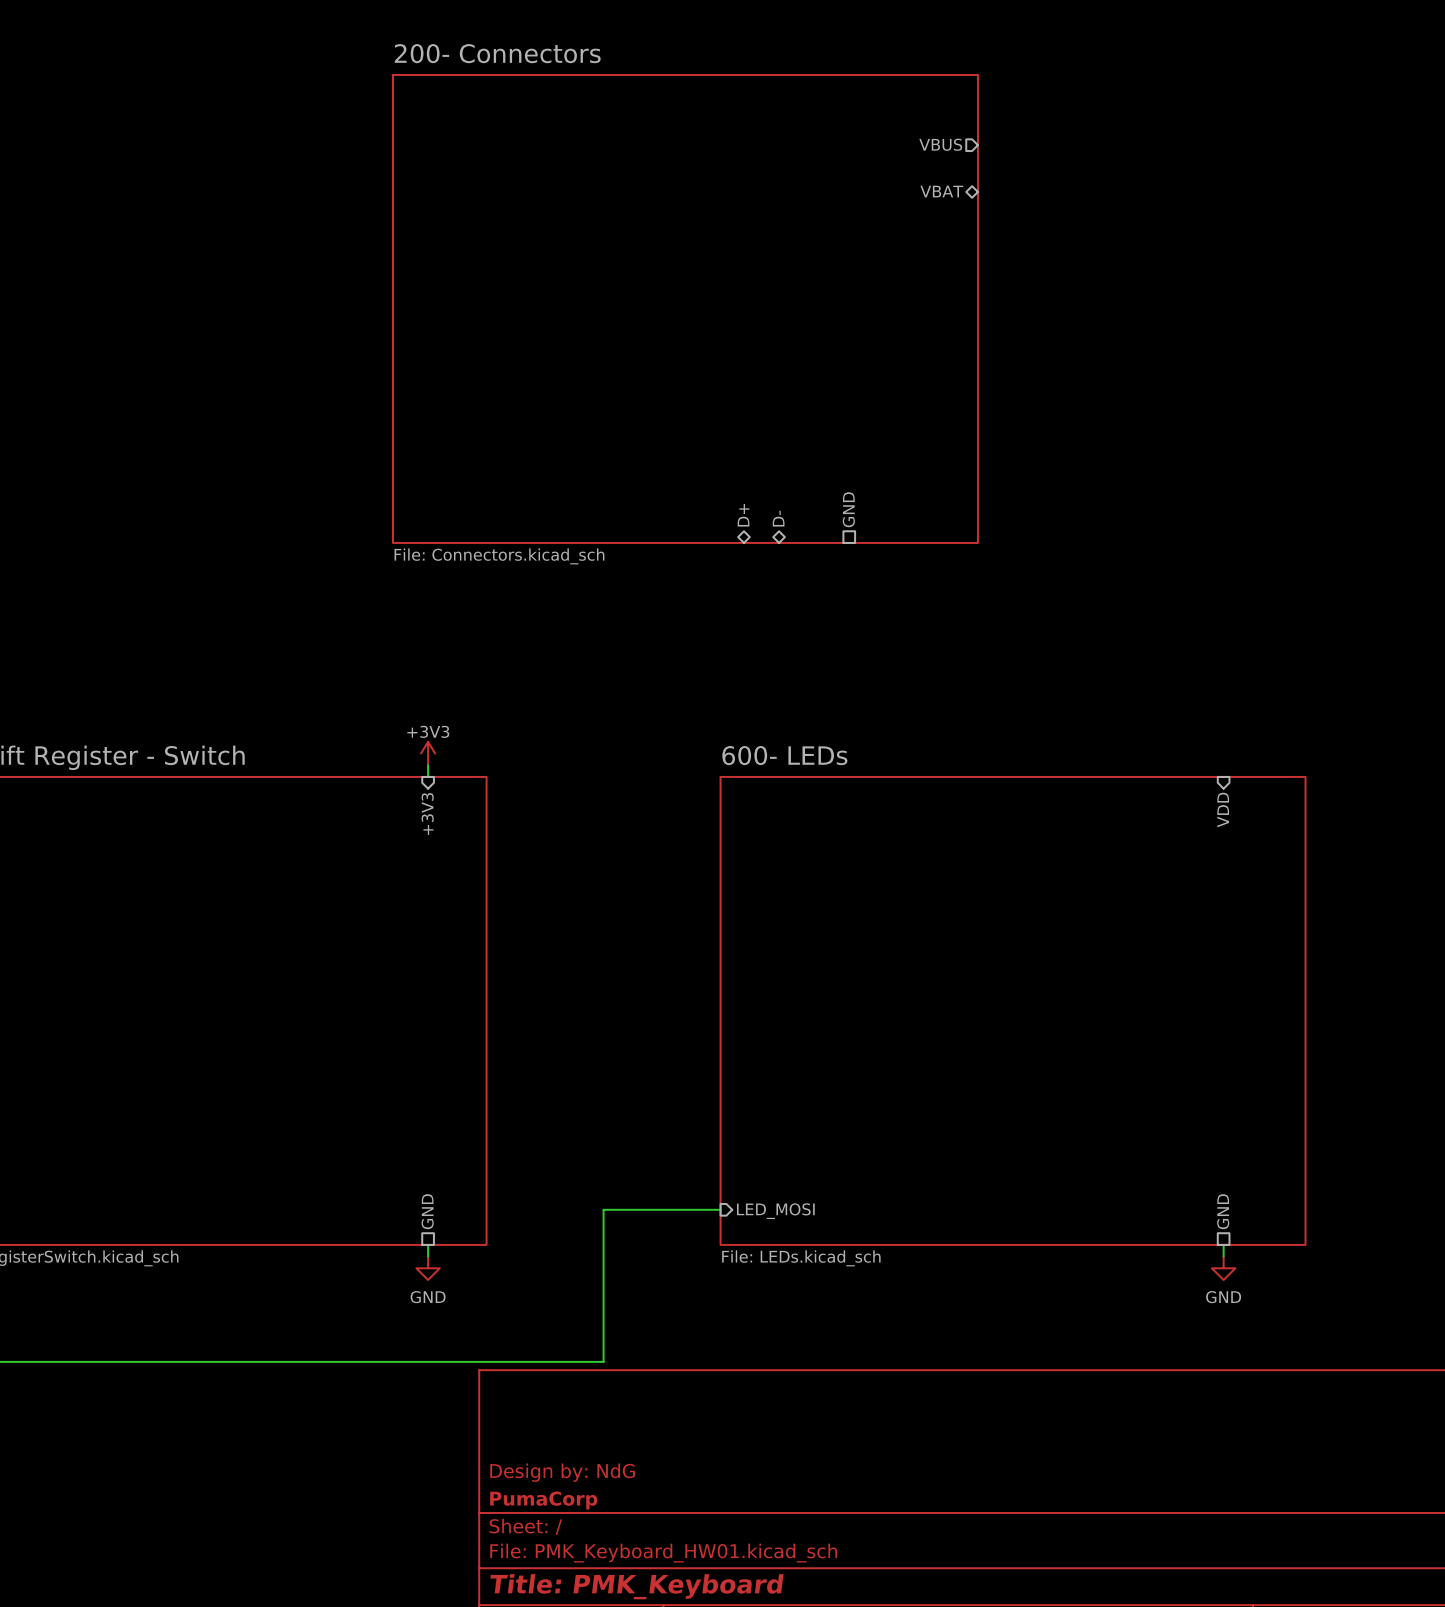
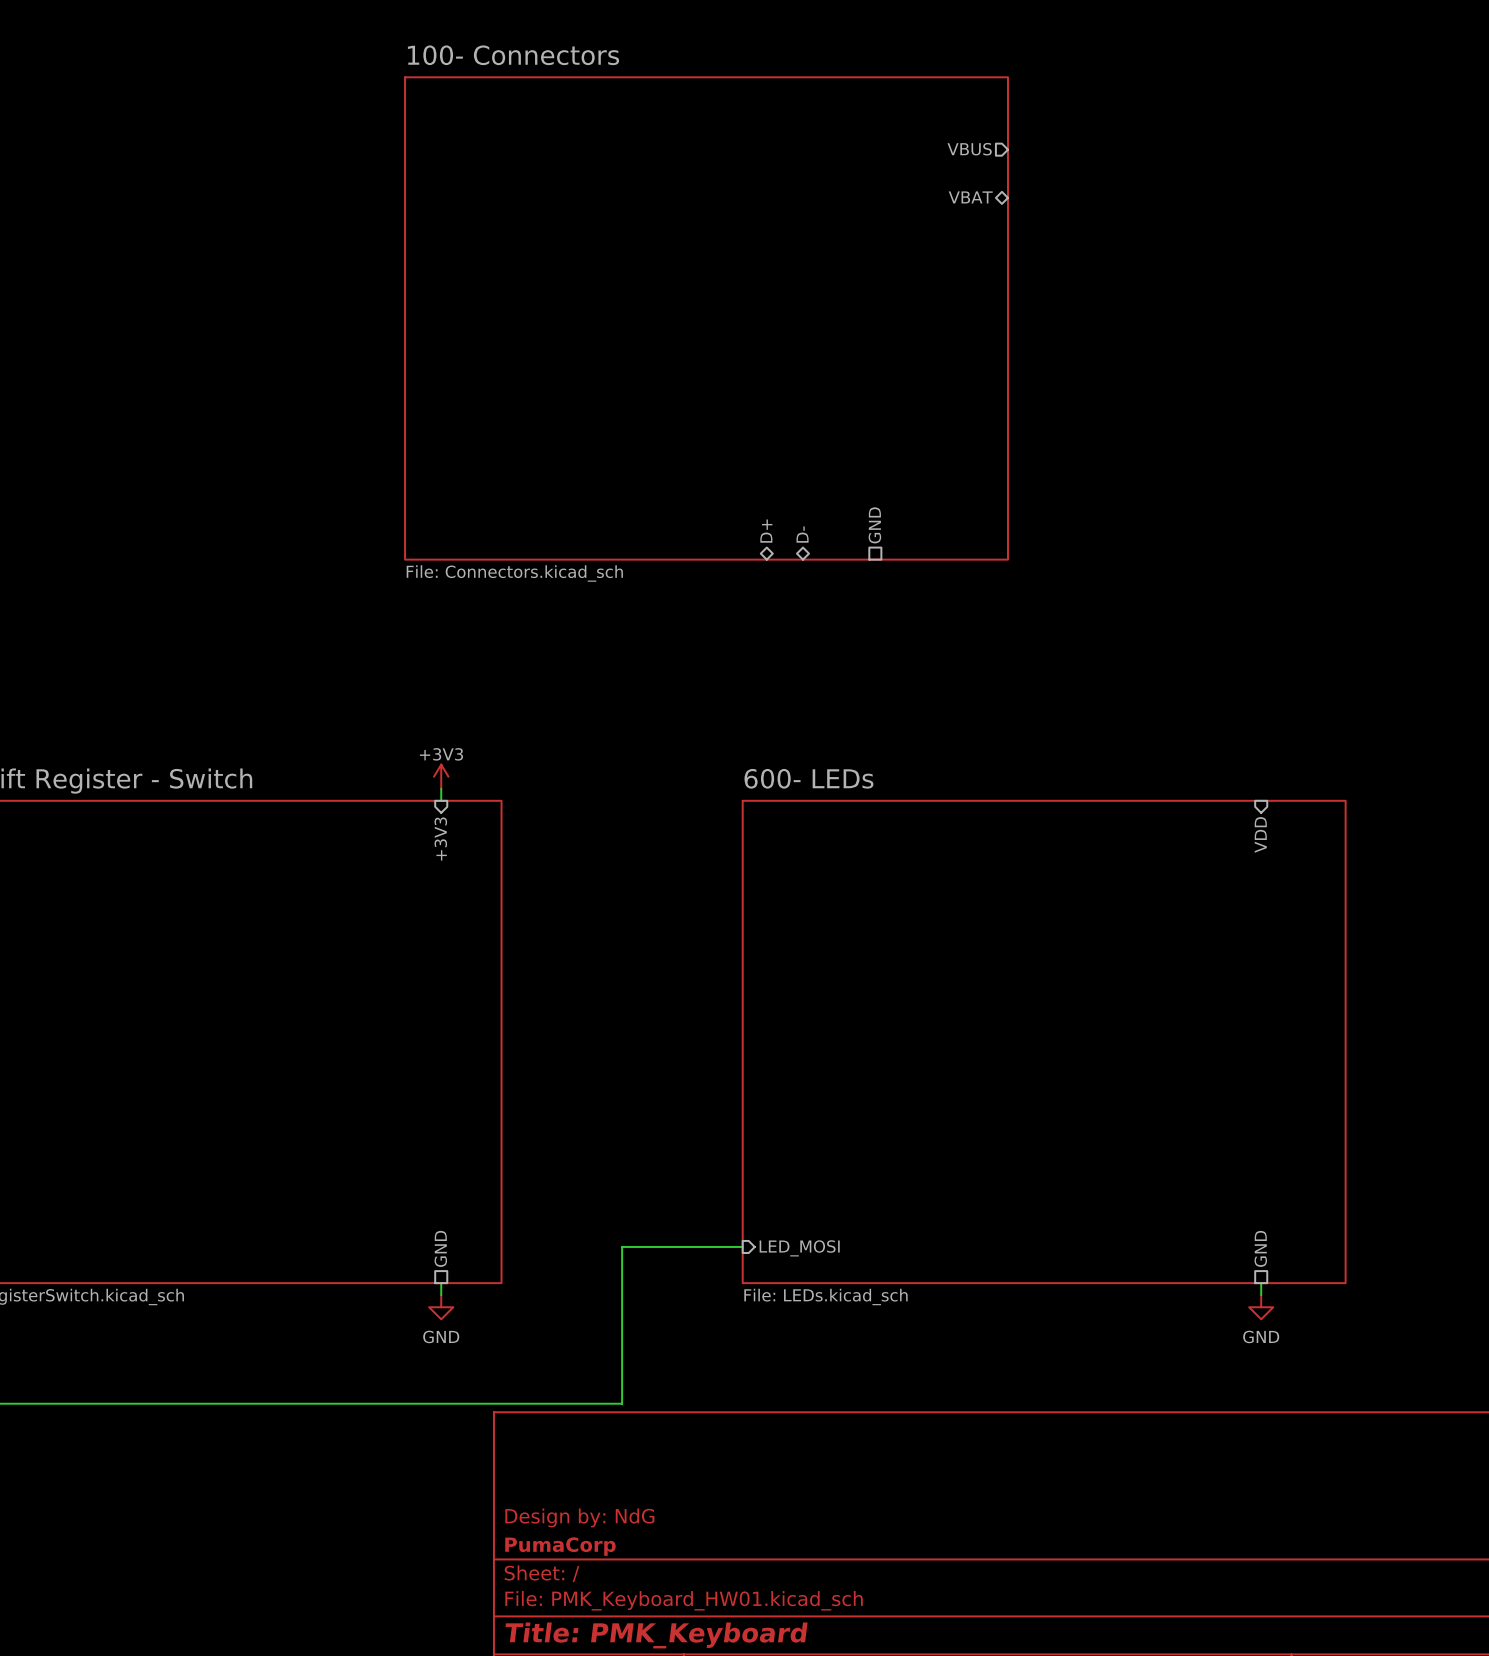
sheet 200- Connectors name: 200- Connectors (497, 53) -> 100- Connectors (513, 55)

